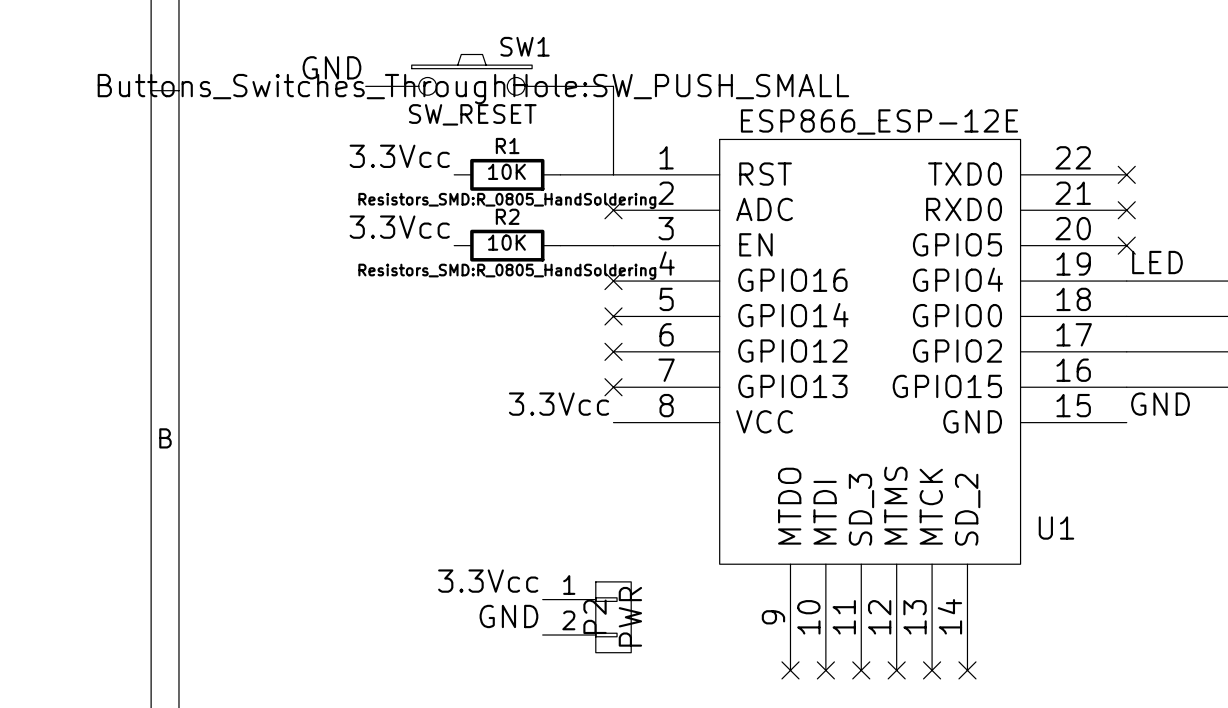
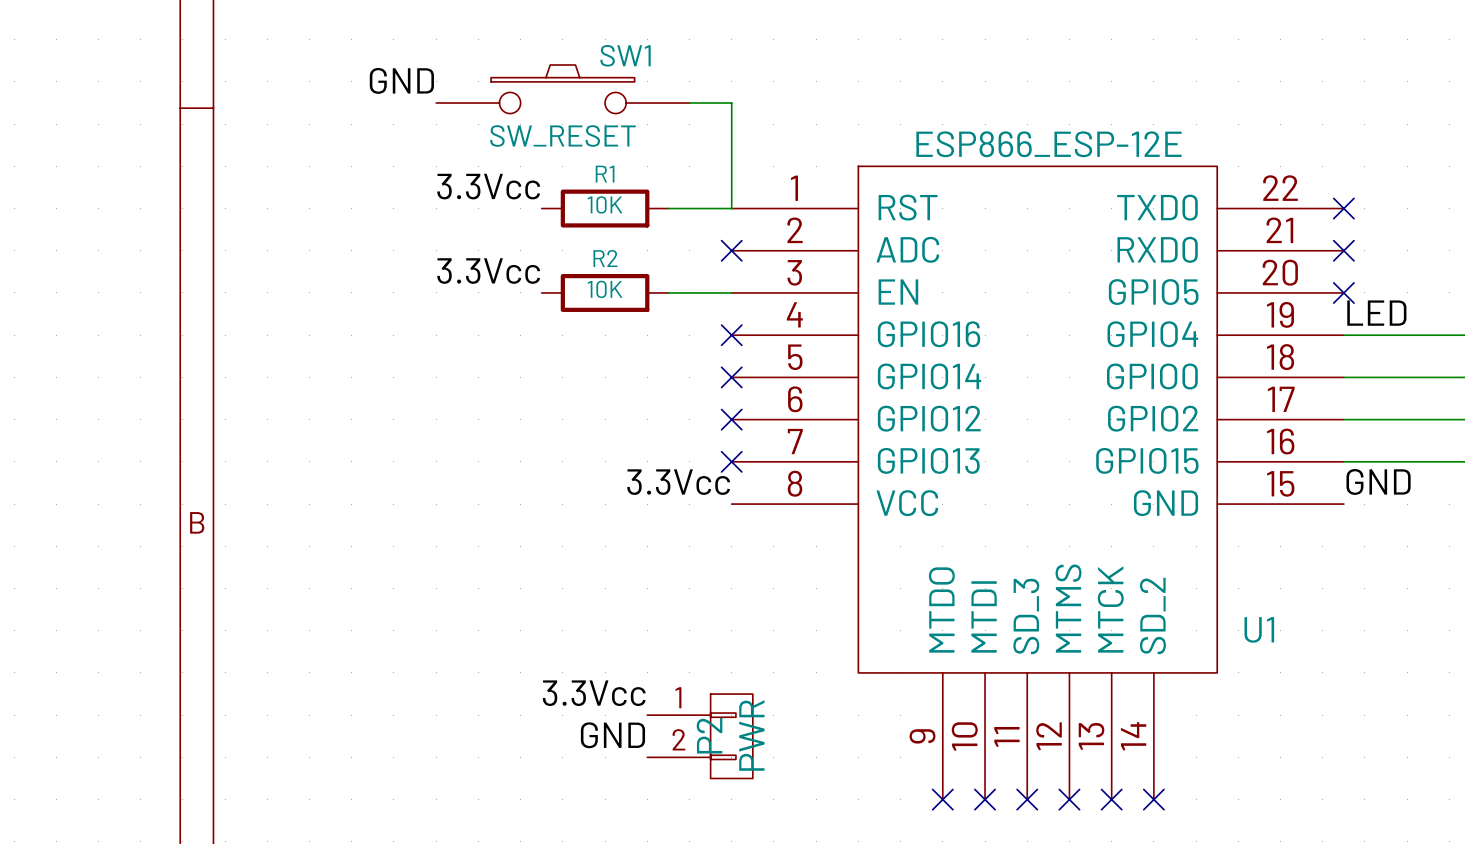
SW1 text: Buttons_Switches_ThroughHole:SW_PUSH_SMALL (473, 89) -> none
R1 text: Resistors_SMD:R_0805_HandSoldering (507, 201) -> none
R2 text: Resistors_SMD:R_0805_HandSoldering (507, 271) -> none

